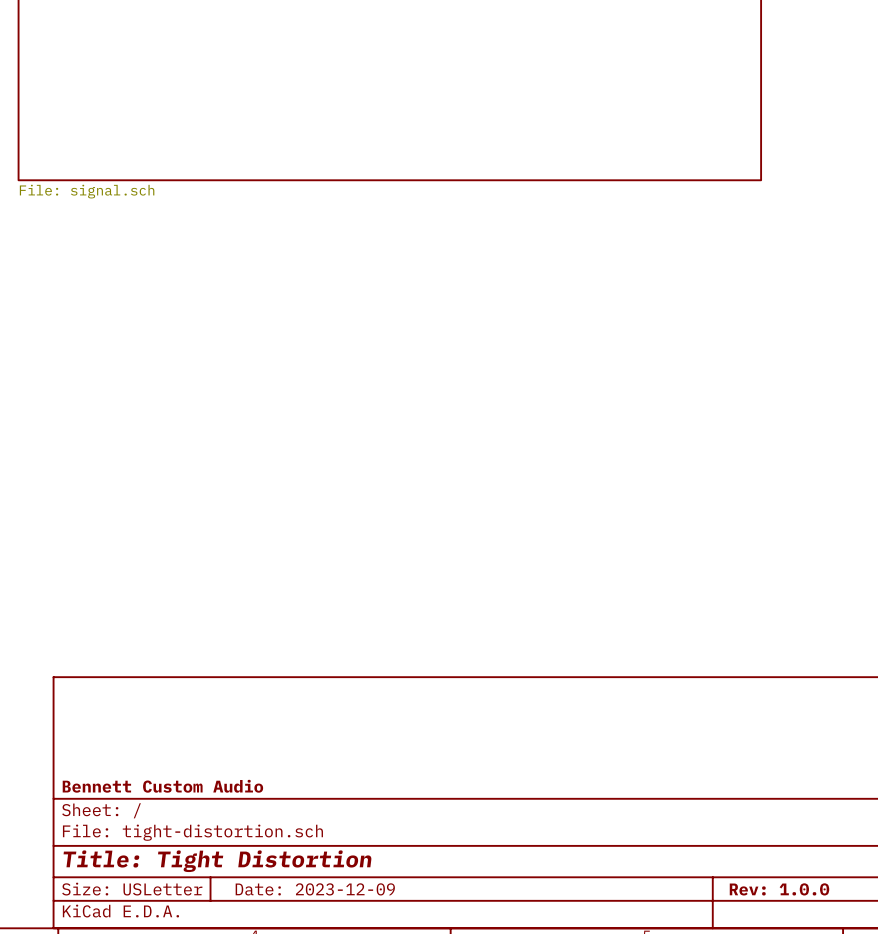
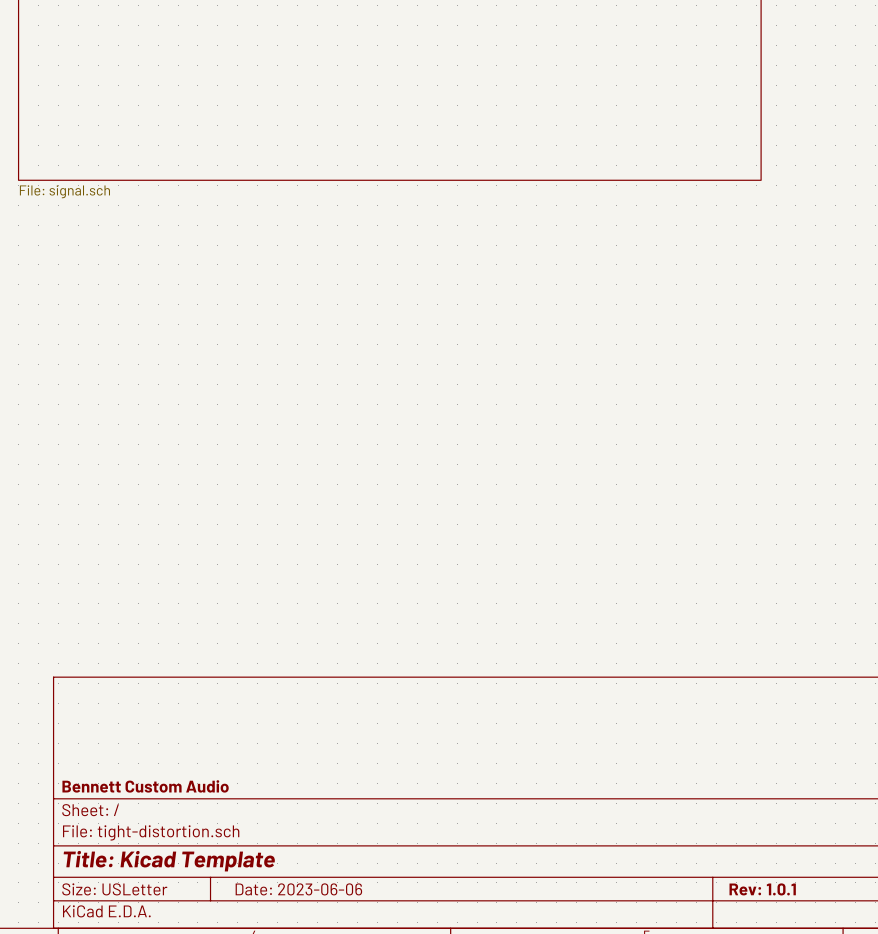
title block: Title: Tight Distortion (217, 861) -> Title: Kicad Template (169, 861)
title block: Date: 2023-12-09 (315, 889) -> Date: 2023-06-06 (298, 889)
title block: Rev: 1.0.0 (779, 889) -> Rev: 1.0.1 (762, 889)

